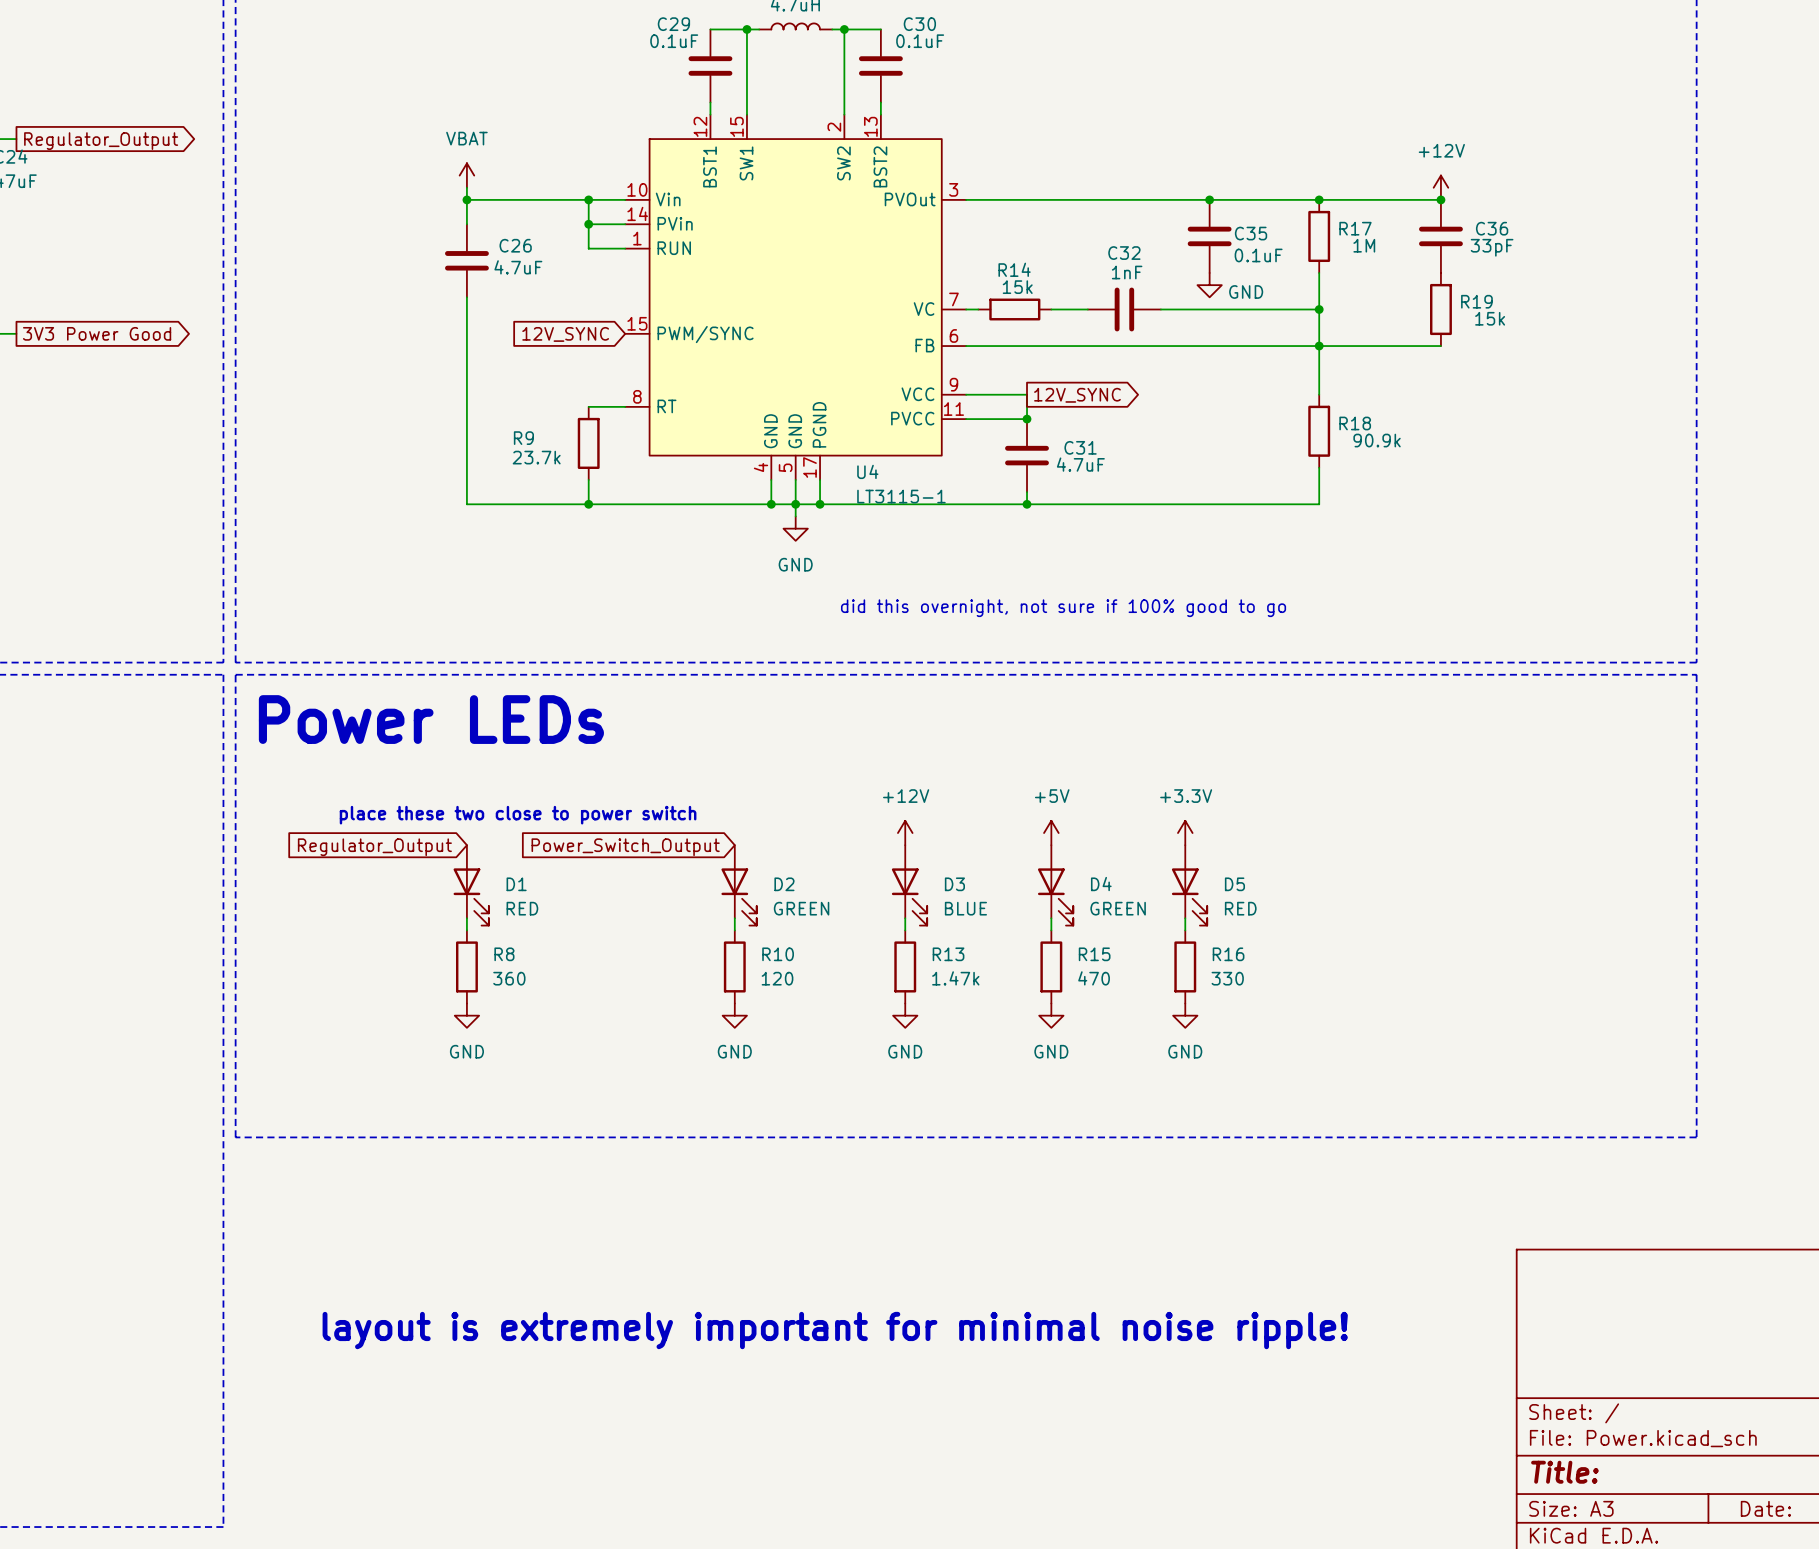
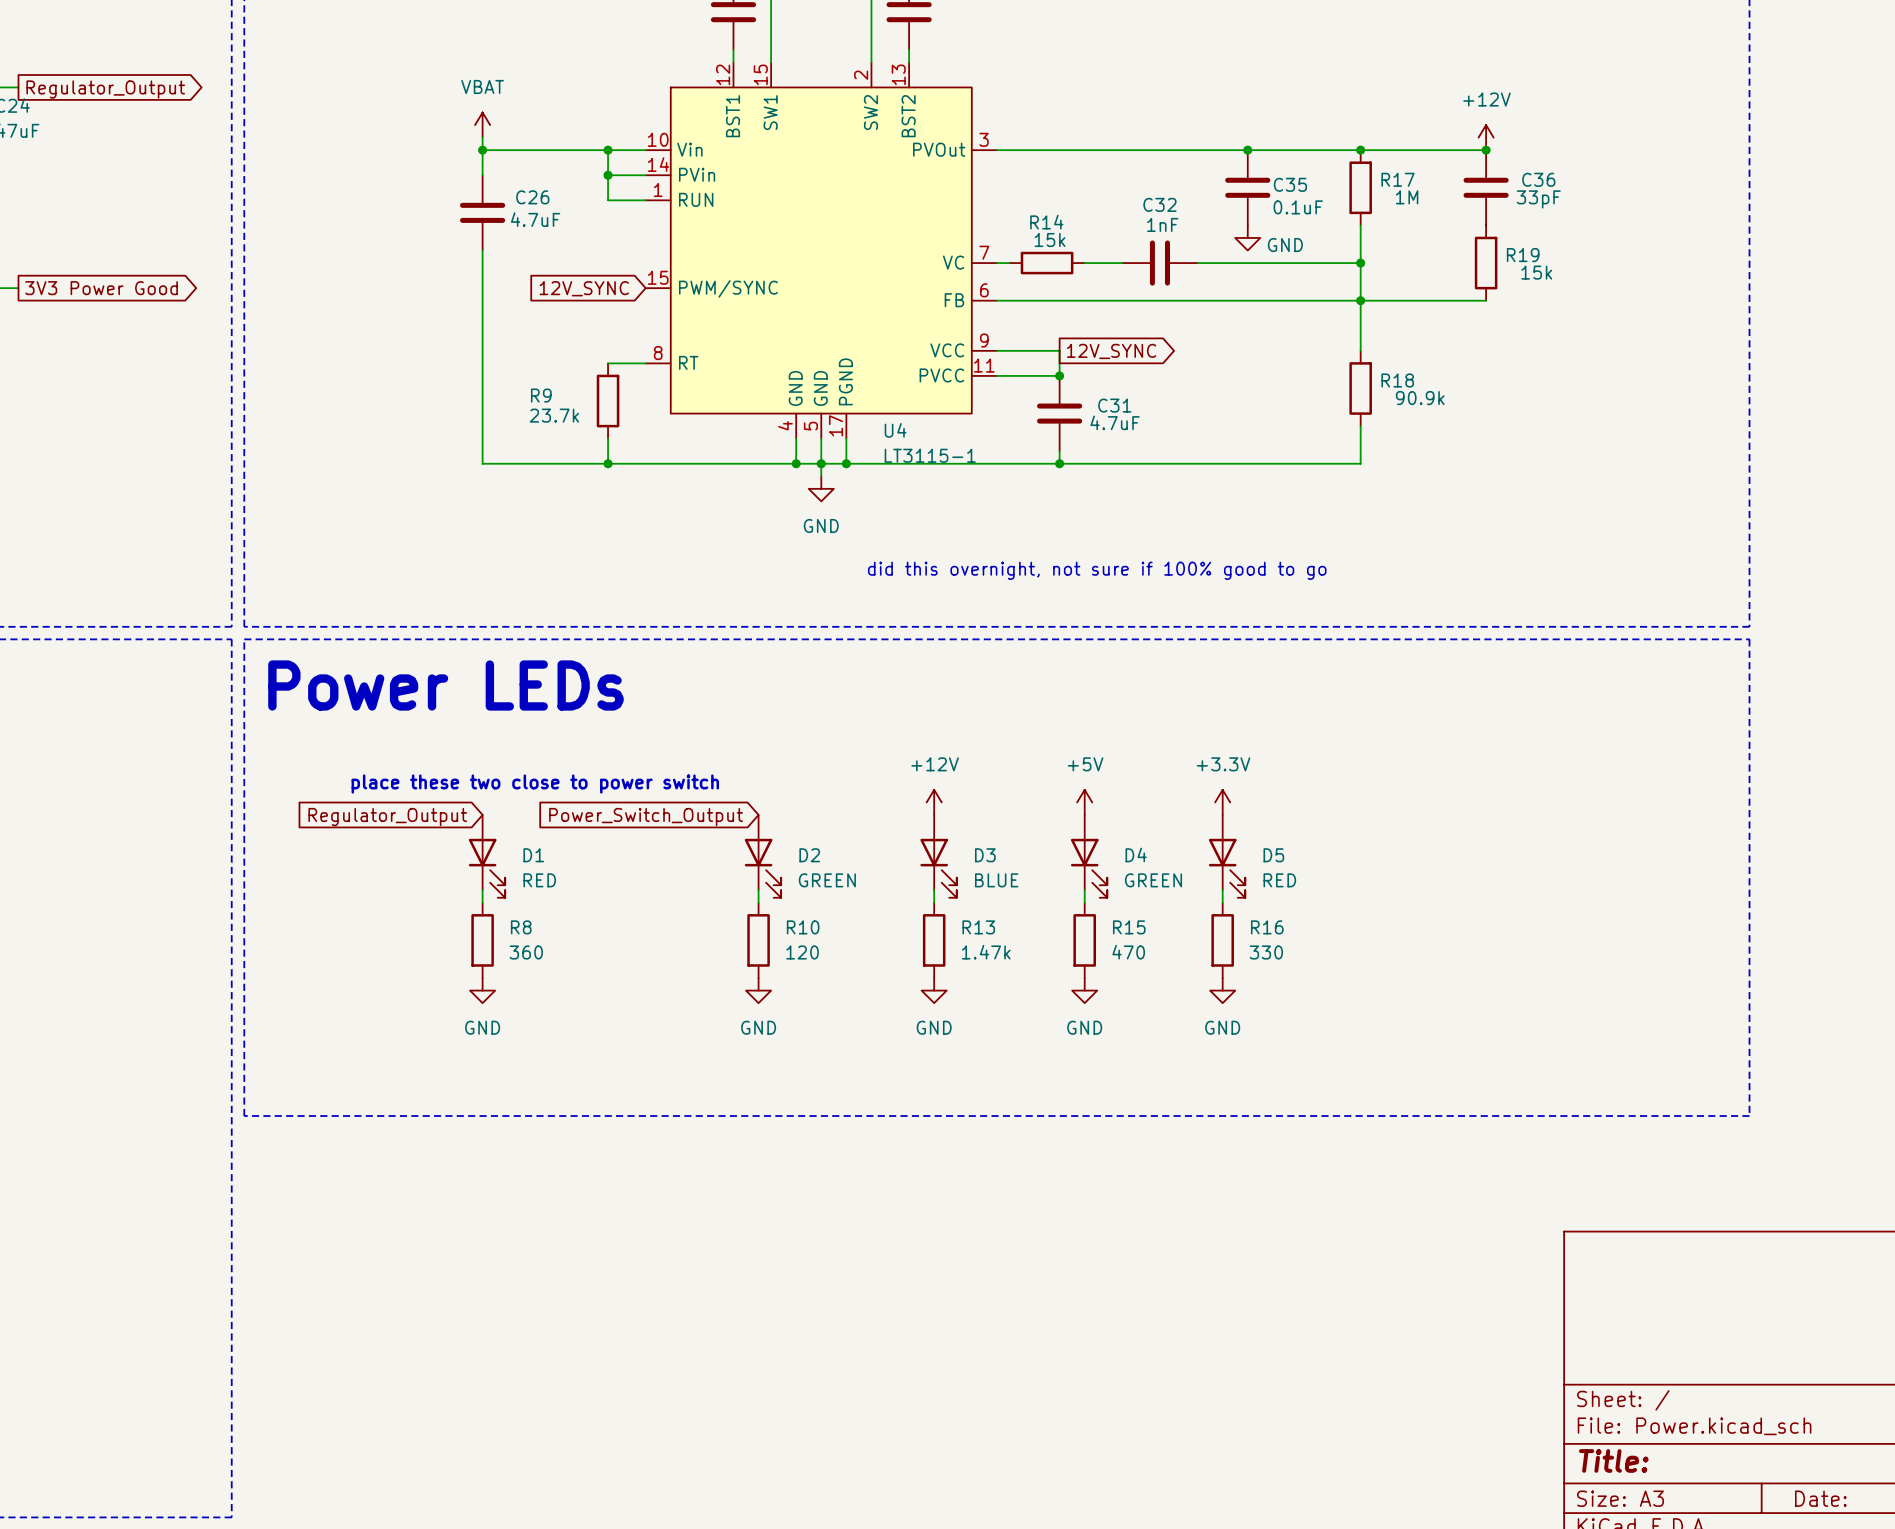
text: layout is extremely important for minimal noise ripple! (835, 1330) -> none

